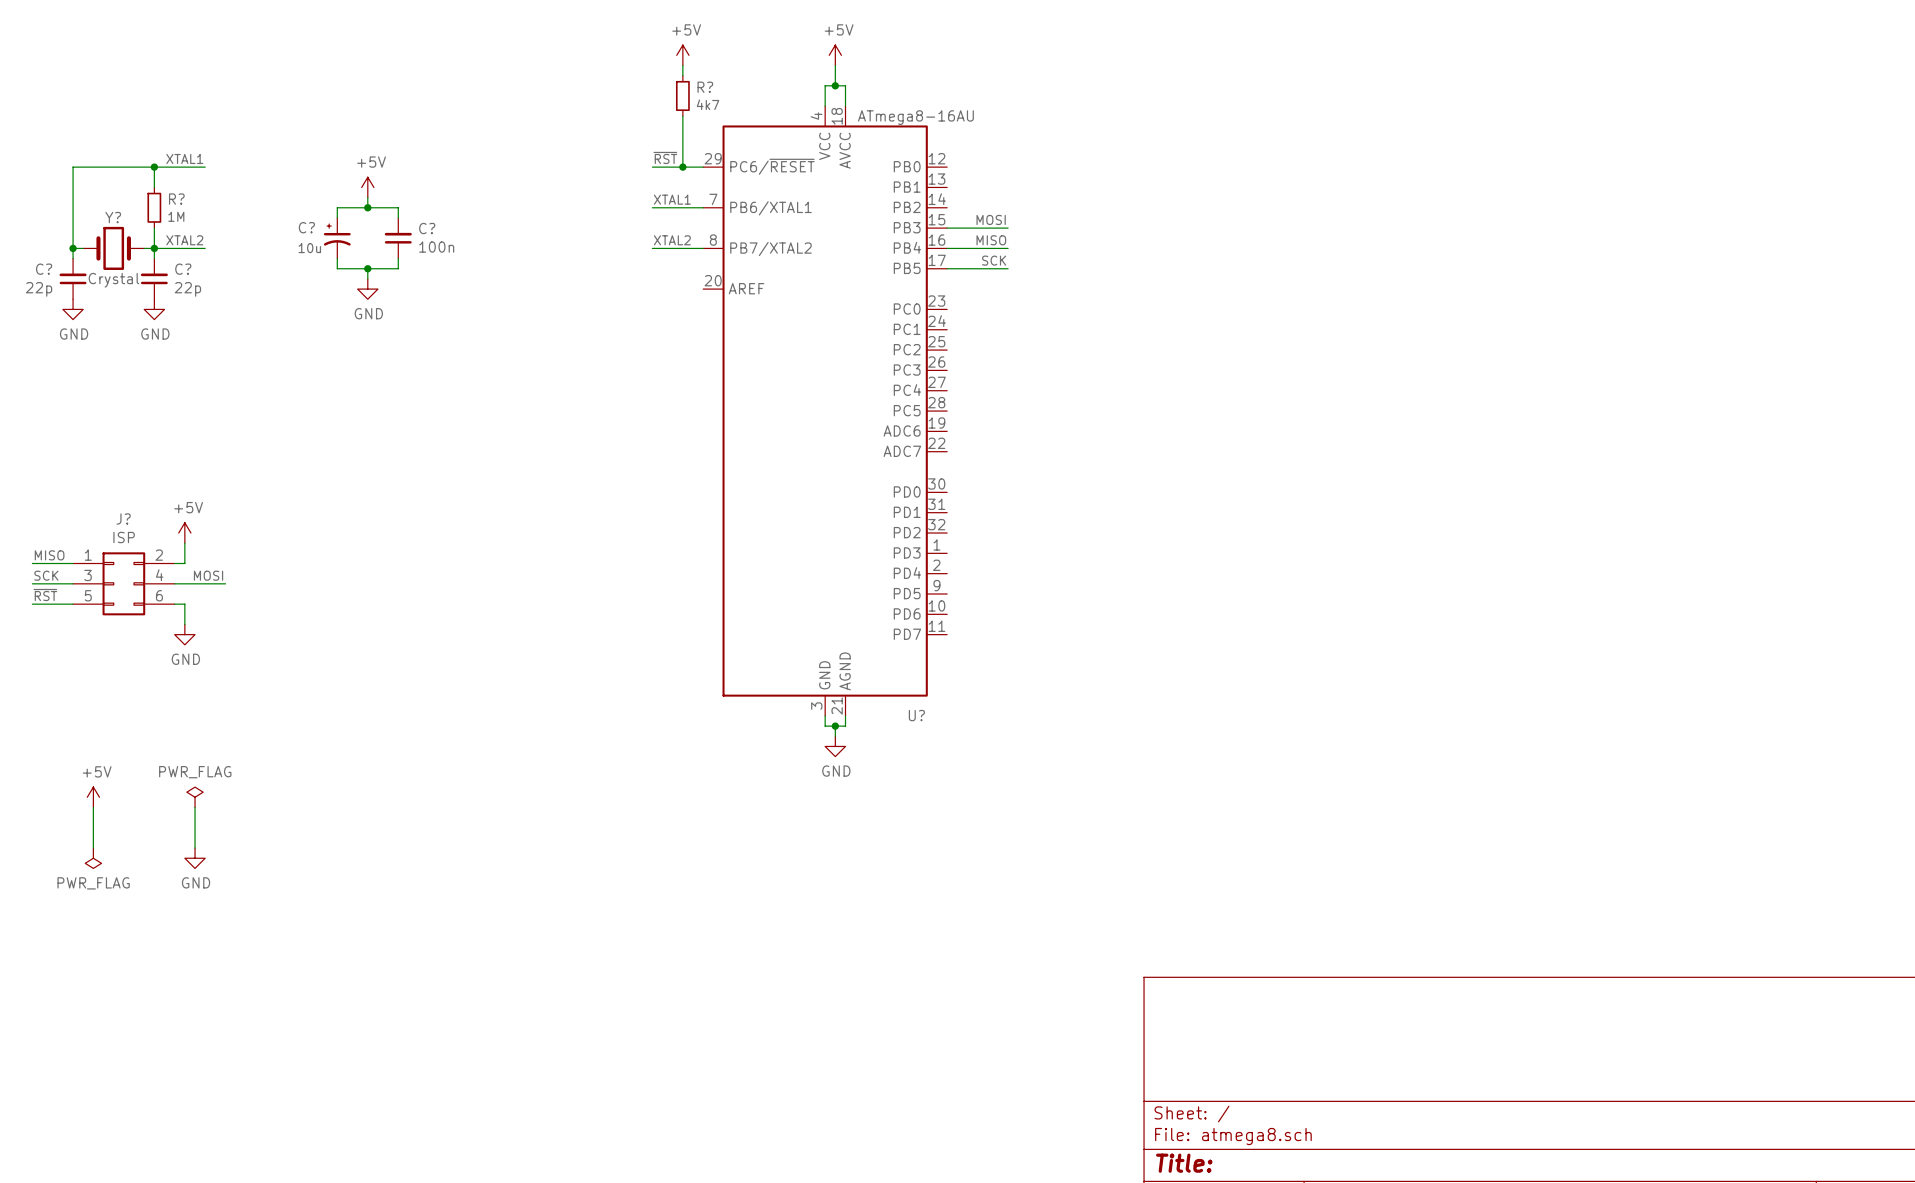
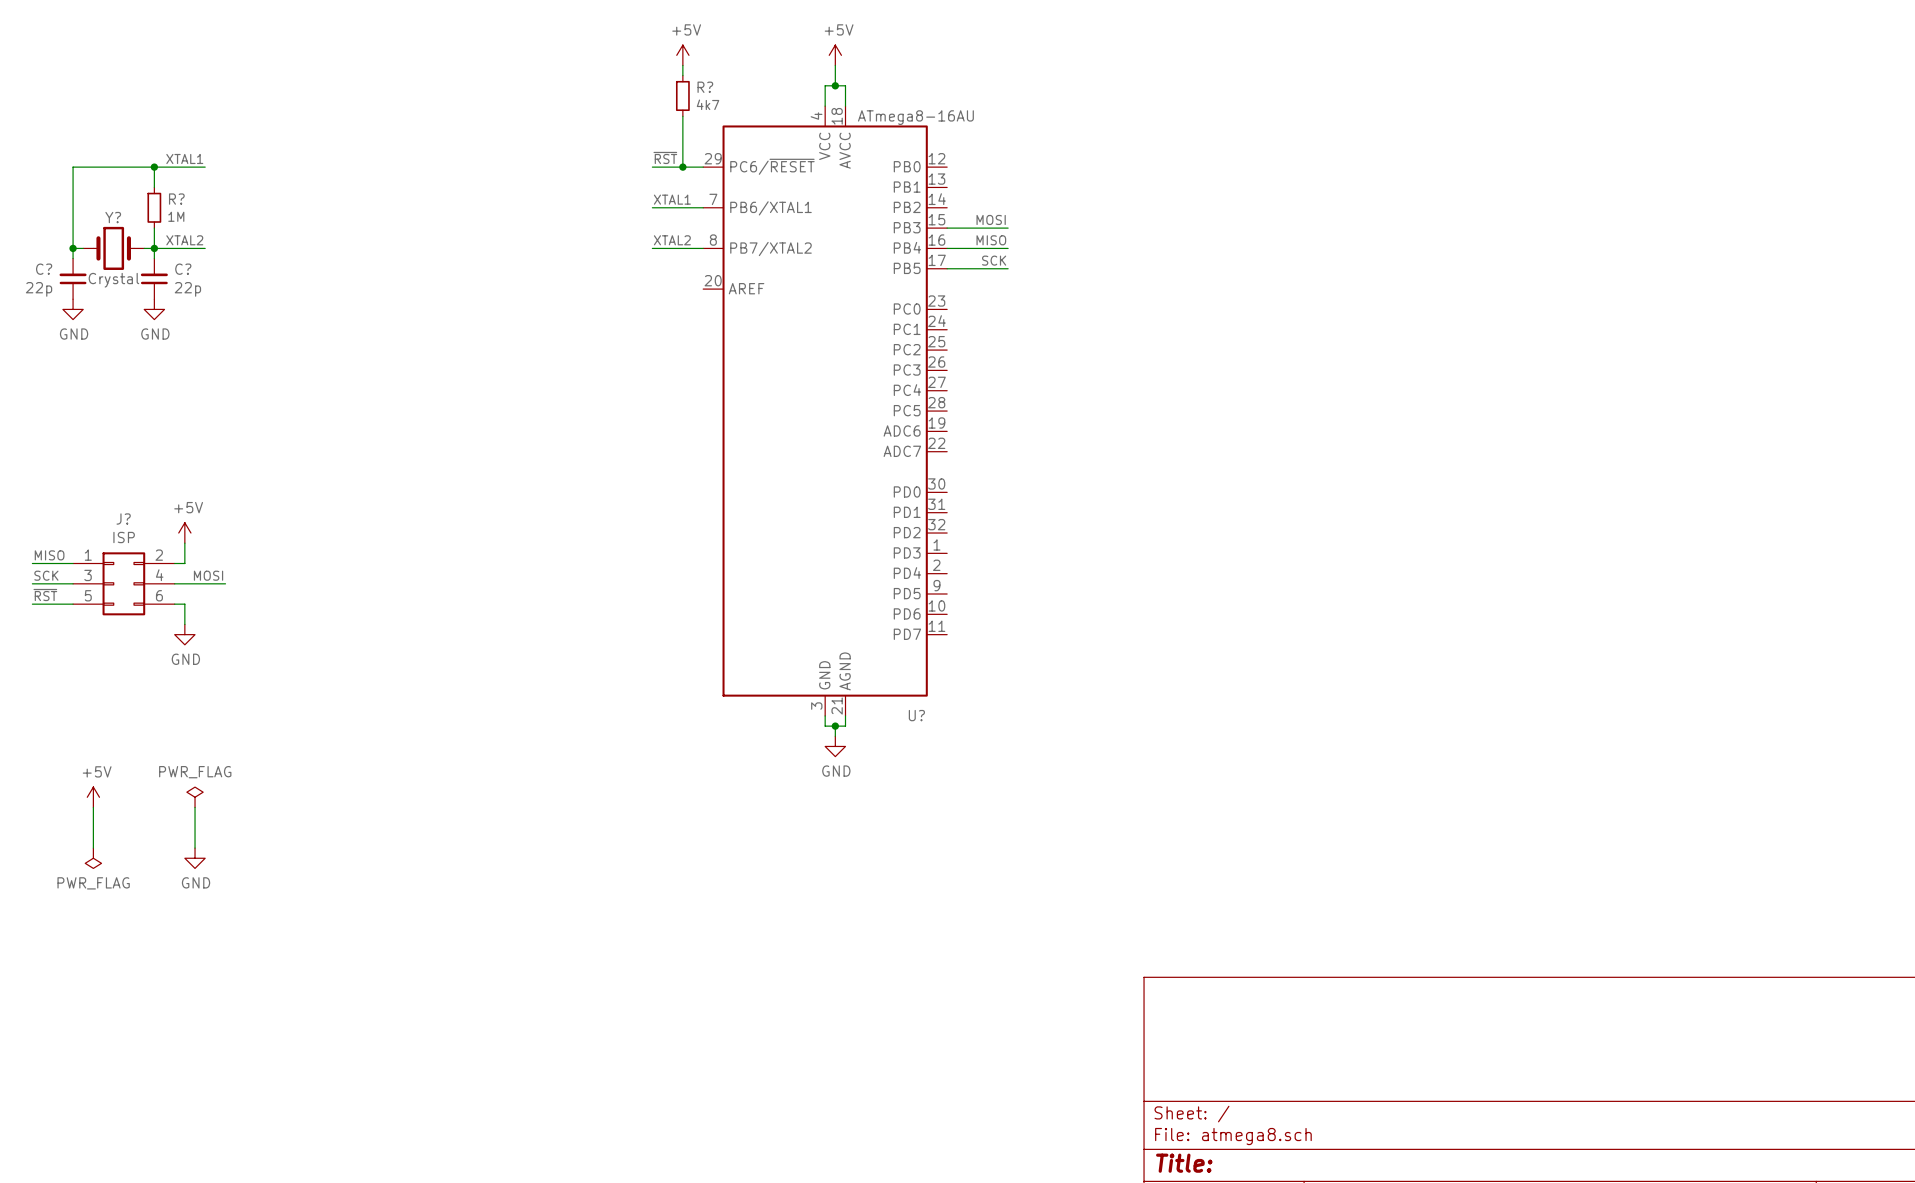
power symbol: +5V (367, 187) -> none
wire: (367, 197) (367, 207) -> none
junction: (367, 207) -> none
wire: (337, 217) (337, 207) (398, 207) (398, 217) -> none
C?: 10u (337, 238) -> none
C?: 100n (398, 238) -> none
wire: (337, 258) (337, 268) (398, 268) (398, 258) -> none
wire: (367, 268) (367, 278) -> none
junction: (367, 268) -> none
power symbol: GND (367, 289) -> none

